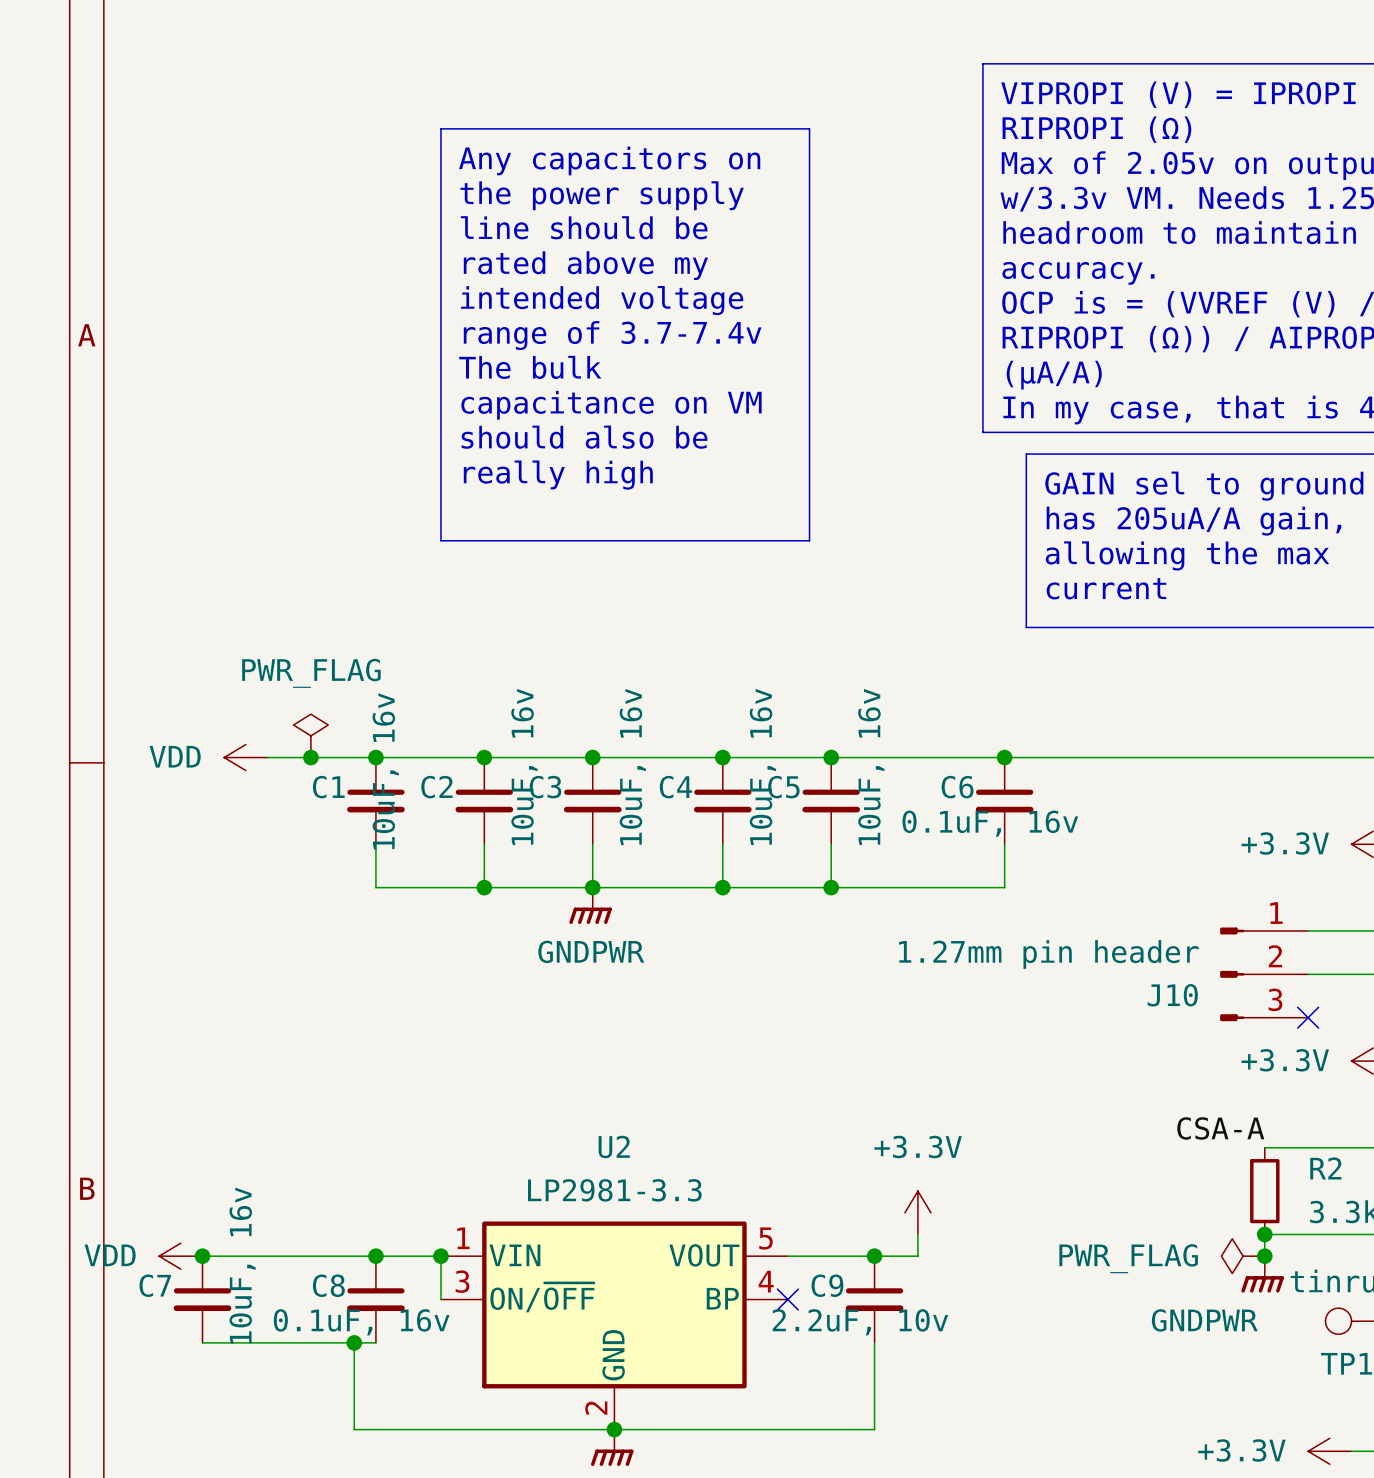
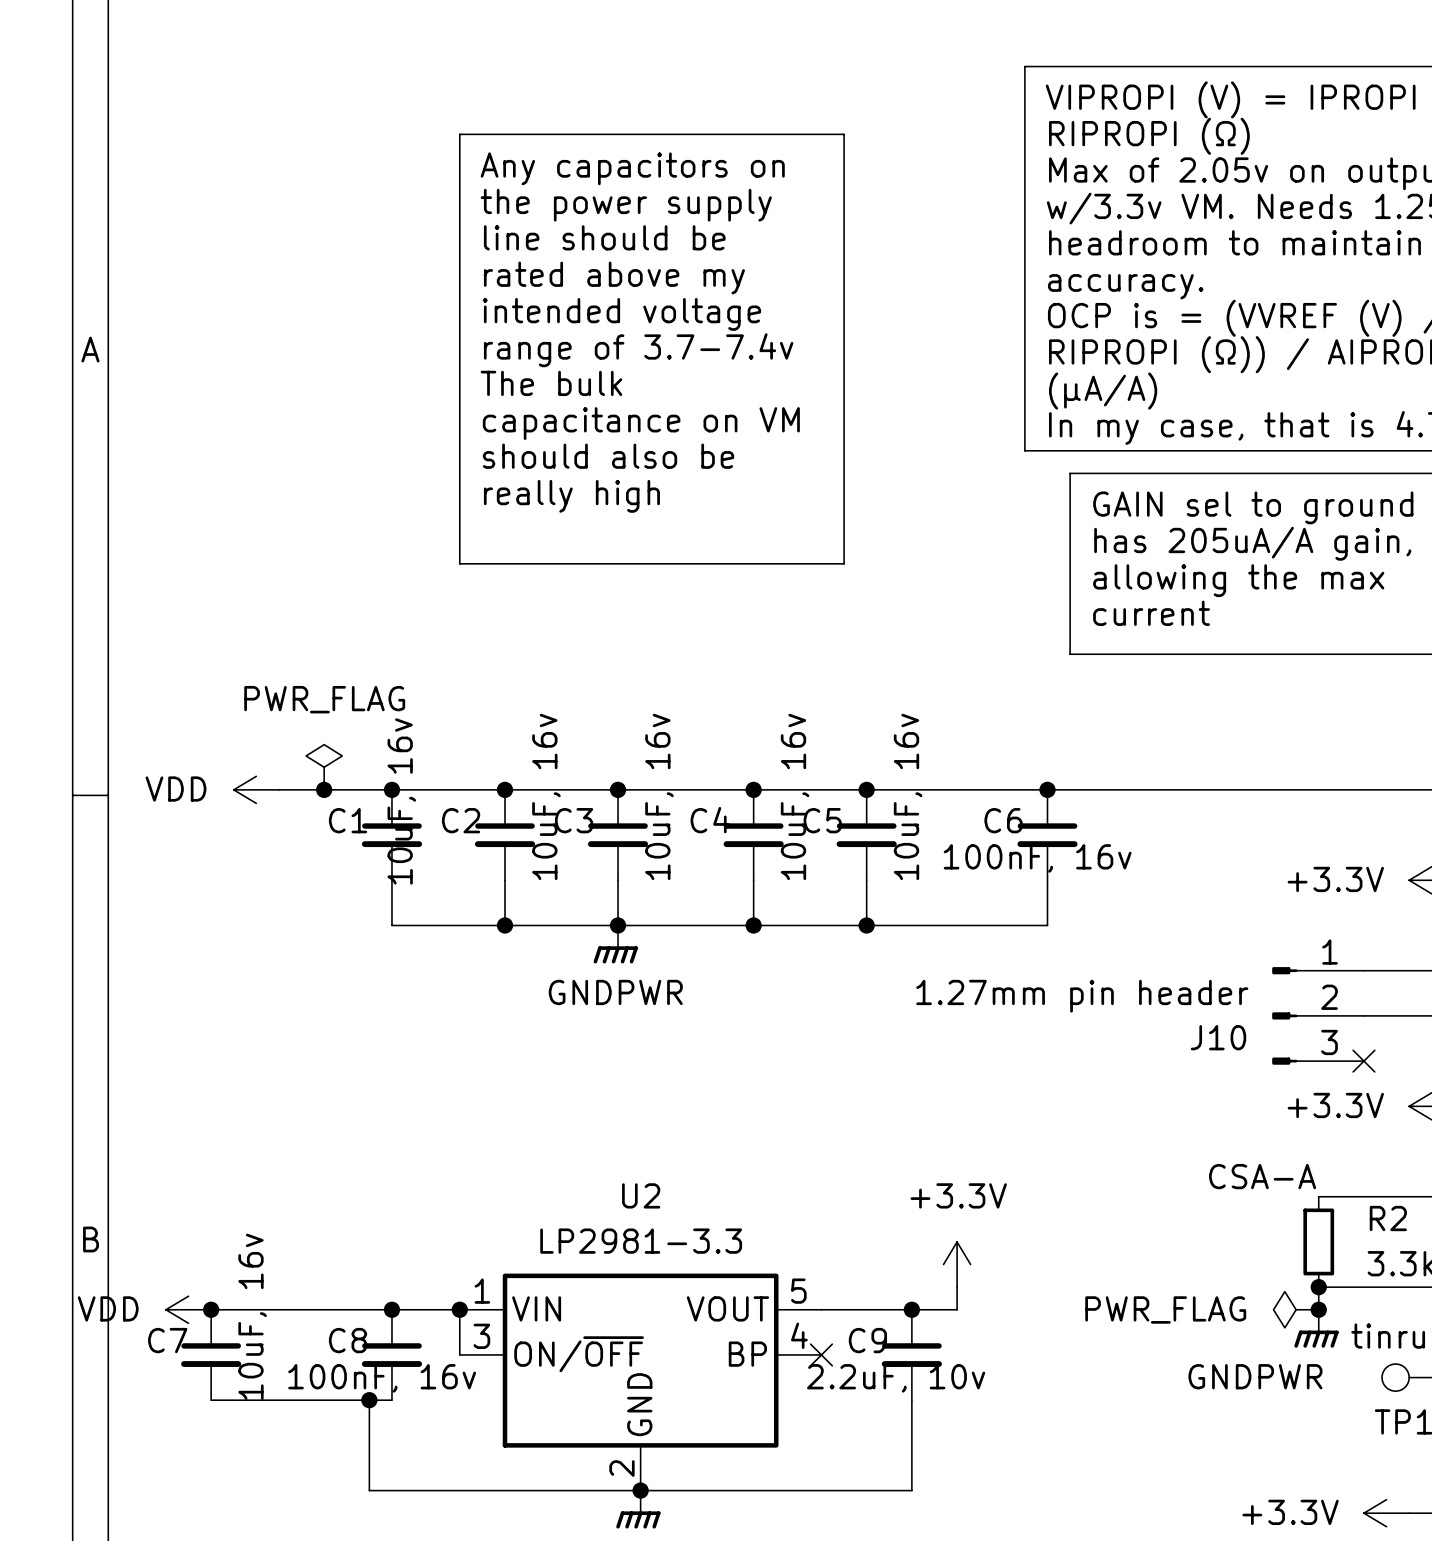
C6 value: 0.1uF, 16v (990, 823) -> 100nF, 16v (1037, 858)
C8 value: 0.1uF, 16v (361, 1322) -> 100nF, 16v (382, 1378)

